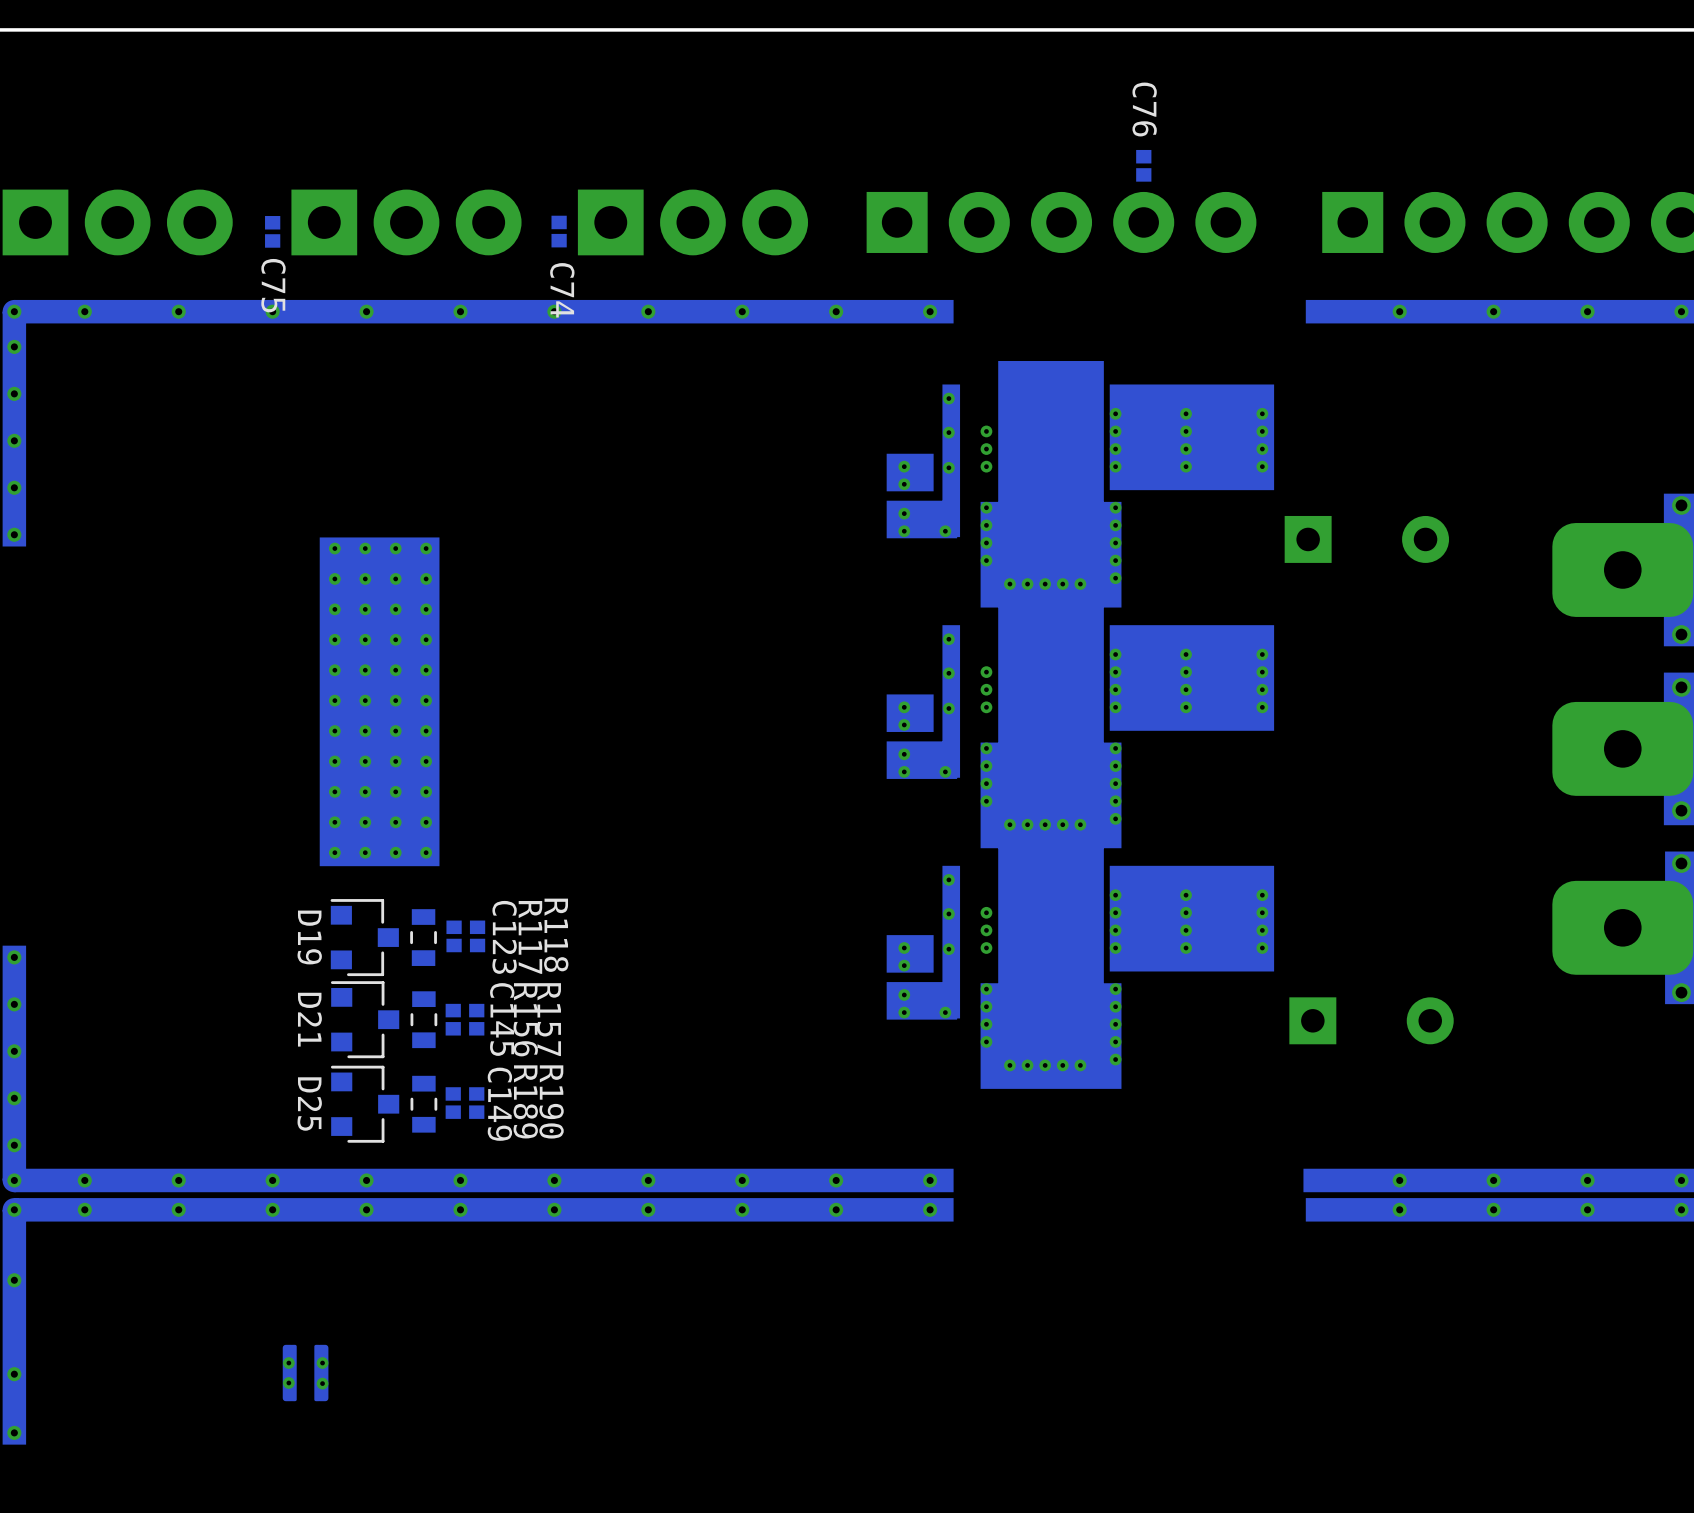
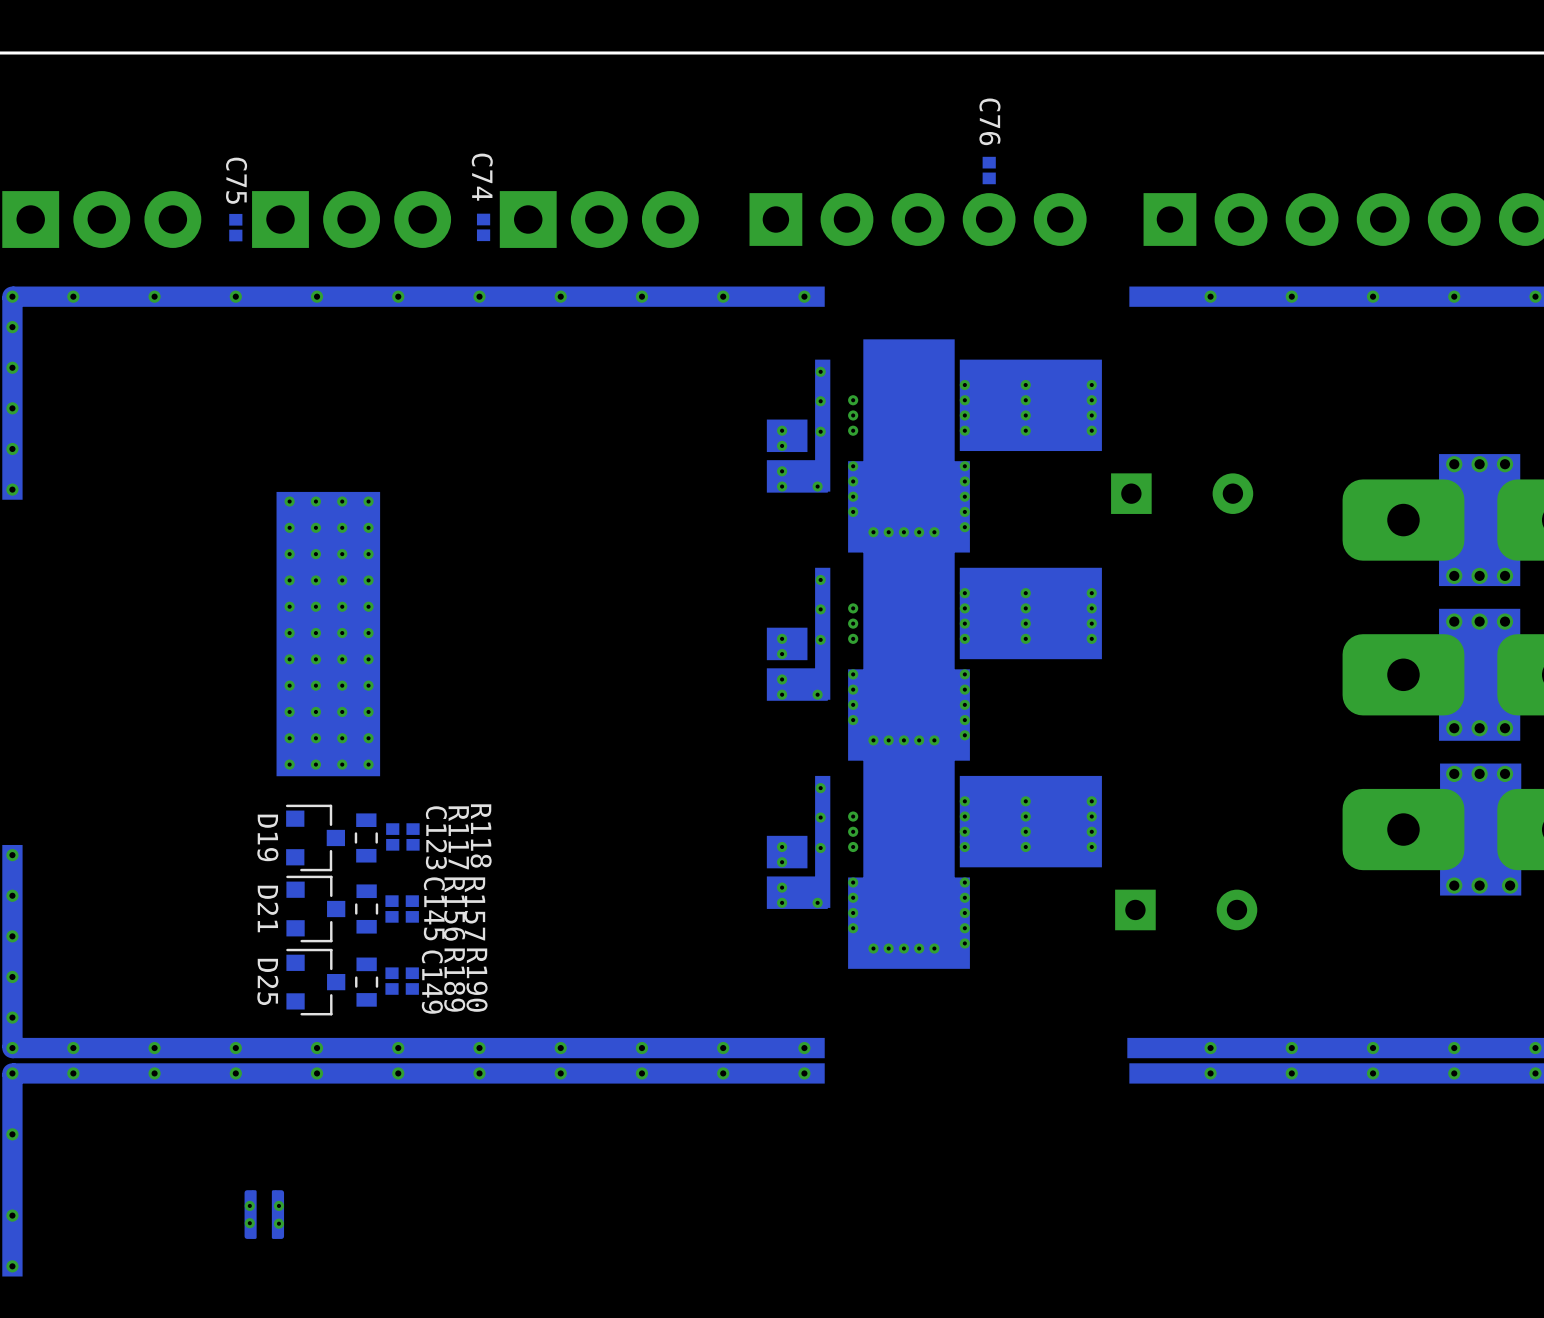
C75 name position: C75 (273, 285) -> C75 (236, 180)
C74 name position: C74 (562, 290) -> C74 (482, 177)

